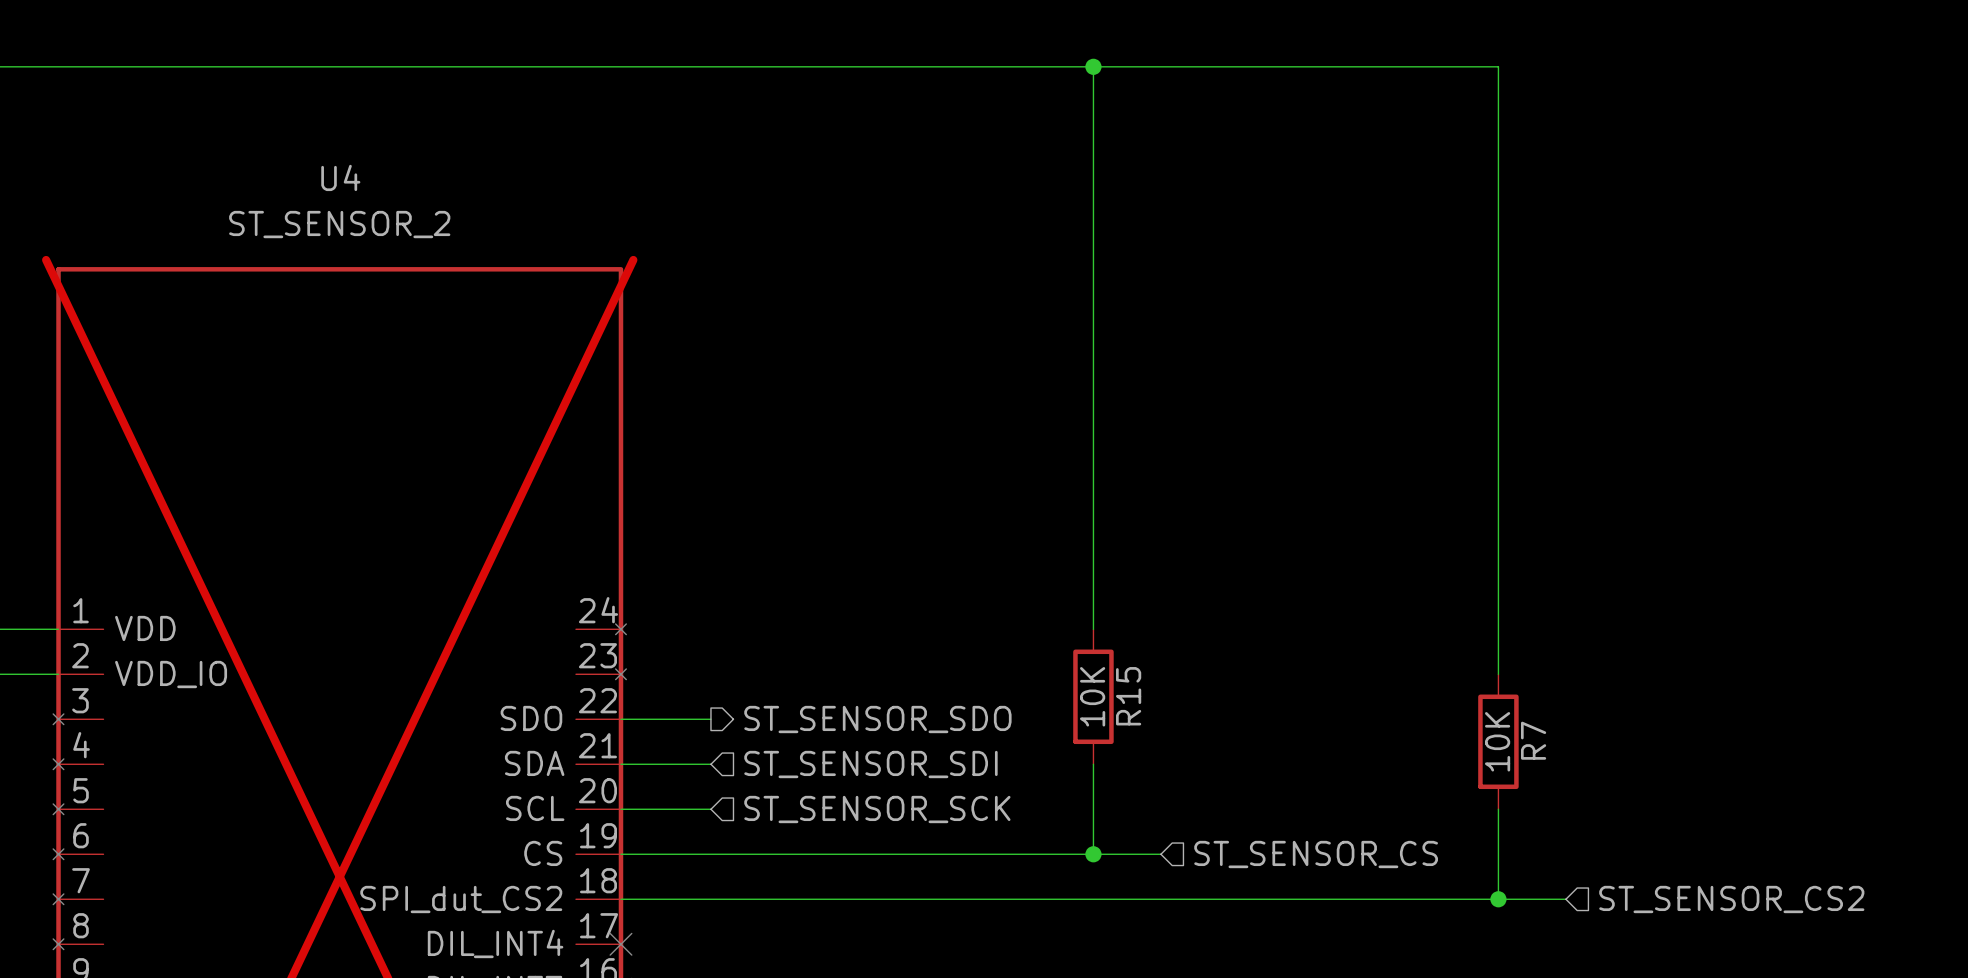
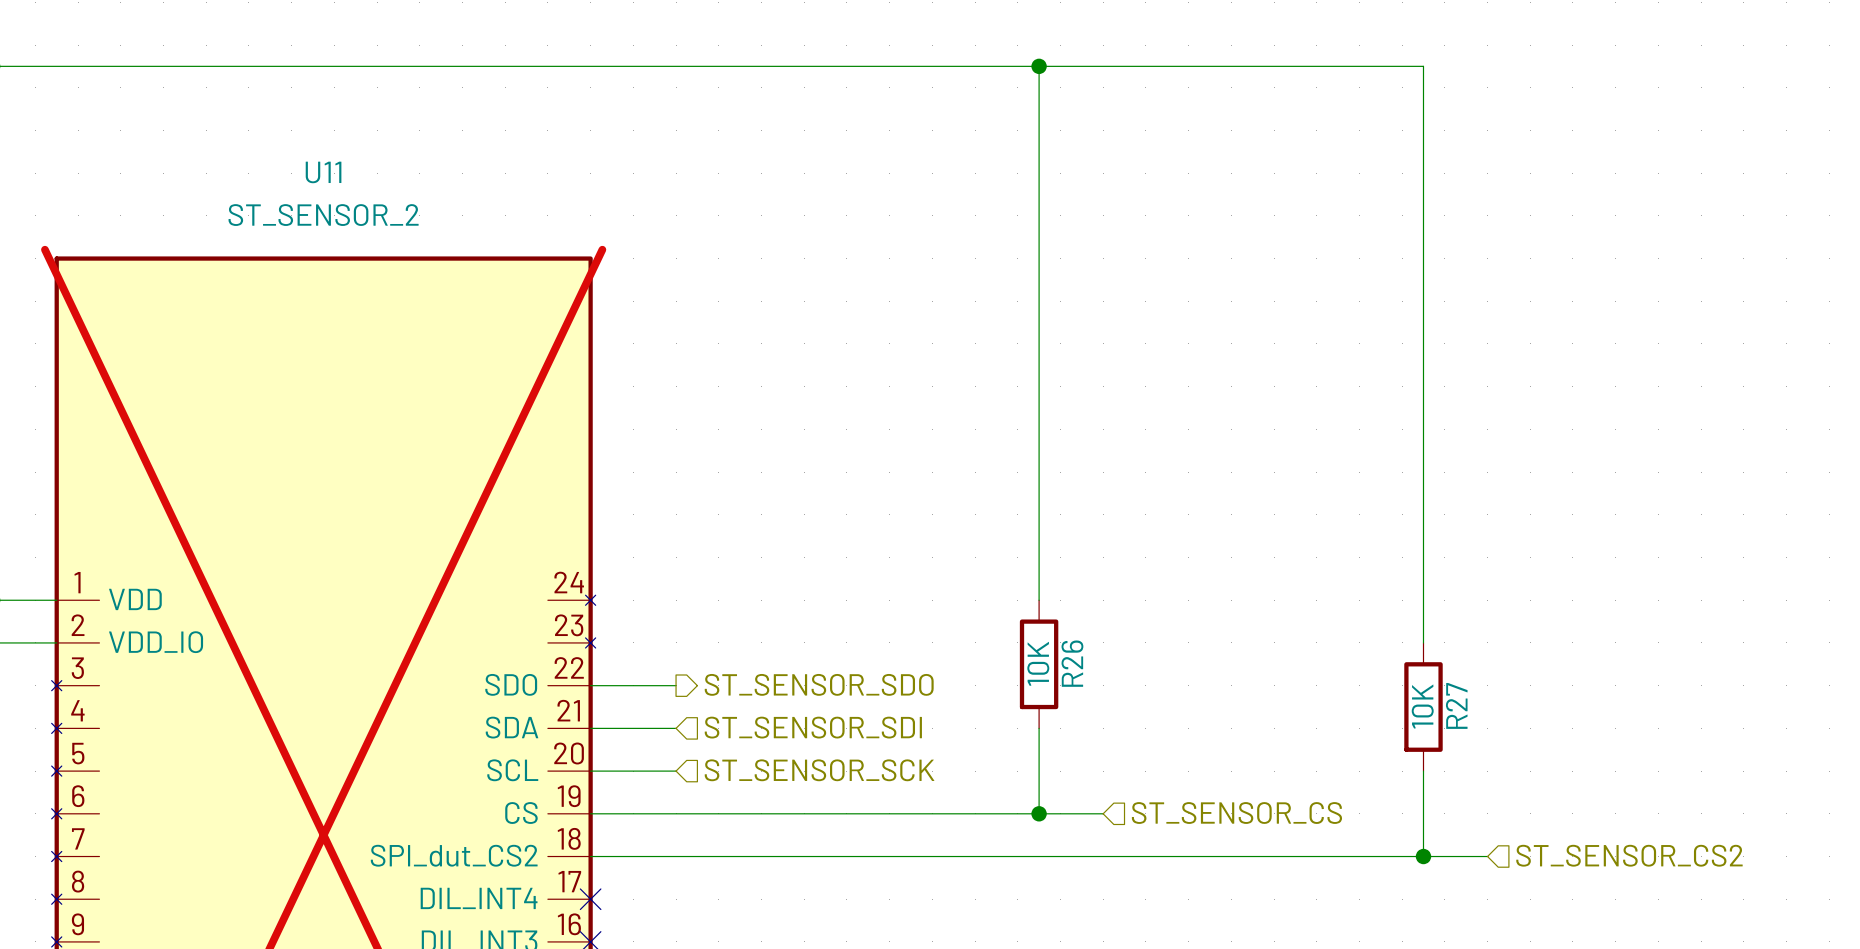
U4 name: U4 (340, 177) -> U11 (323, 172)
R15 name: R15 (1128, 696) -> R26 (1072, 663)
R7 name: R7 (1533, 740) -> R27 (1456, 705)

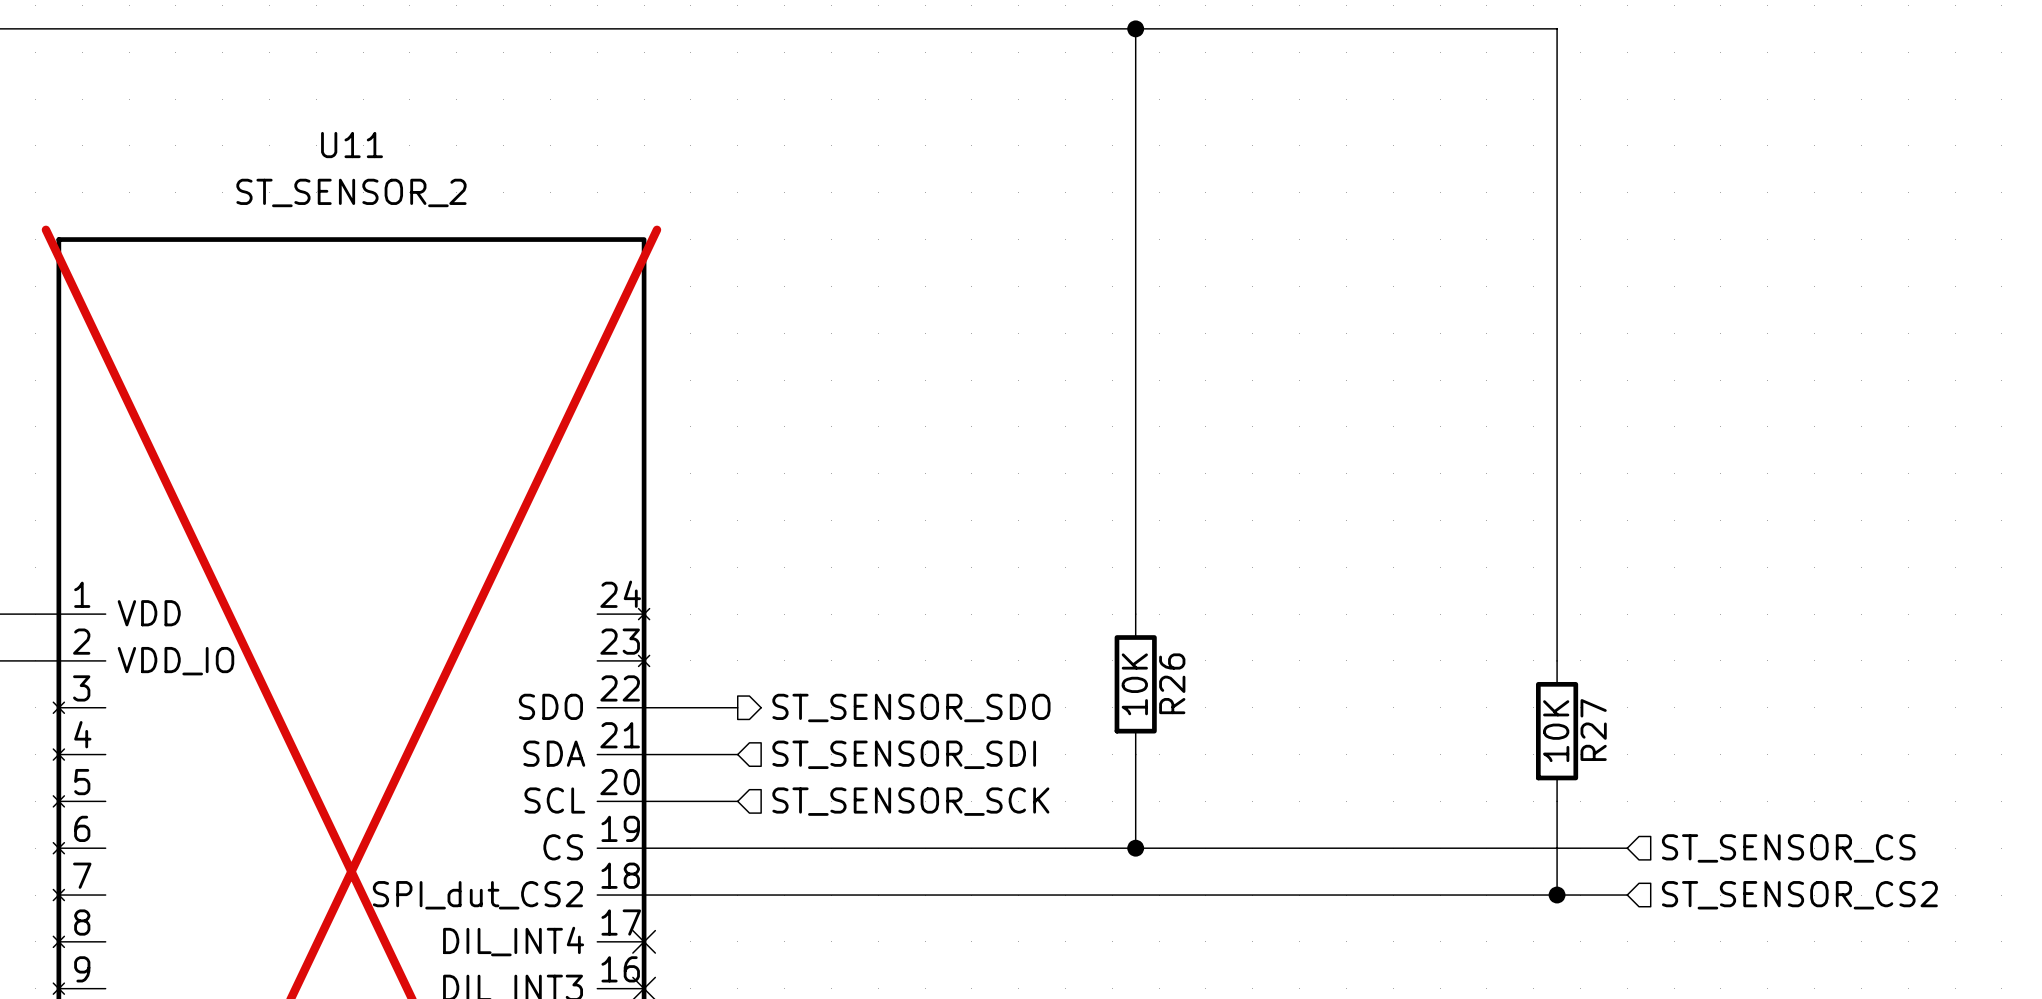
wire: none -> (1205, 848) (1627, 848)
hierarchical label position: ST_SENSOR_CS (1236, 813) -> ST_SENSOR_CS (1788, 848)

